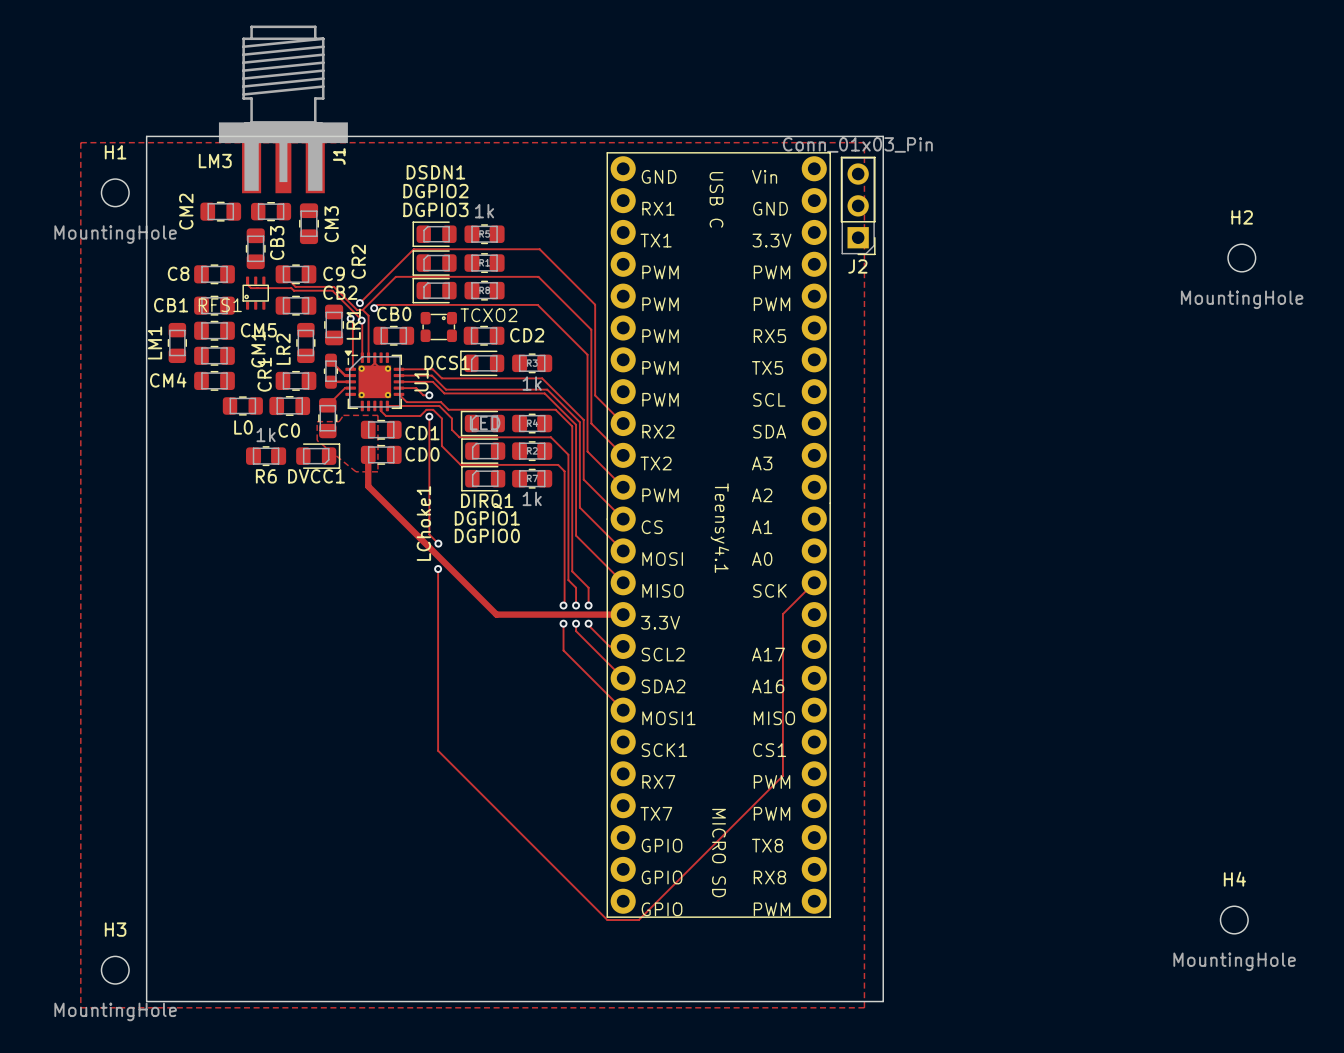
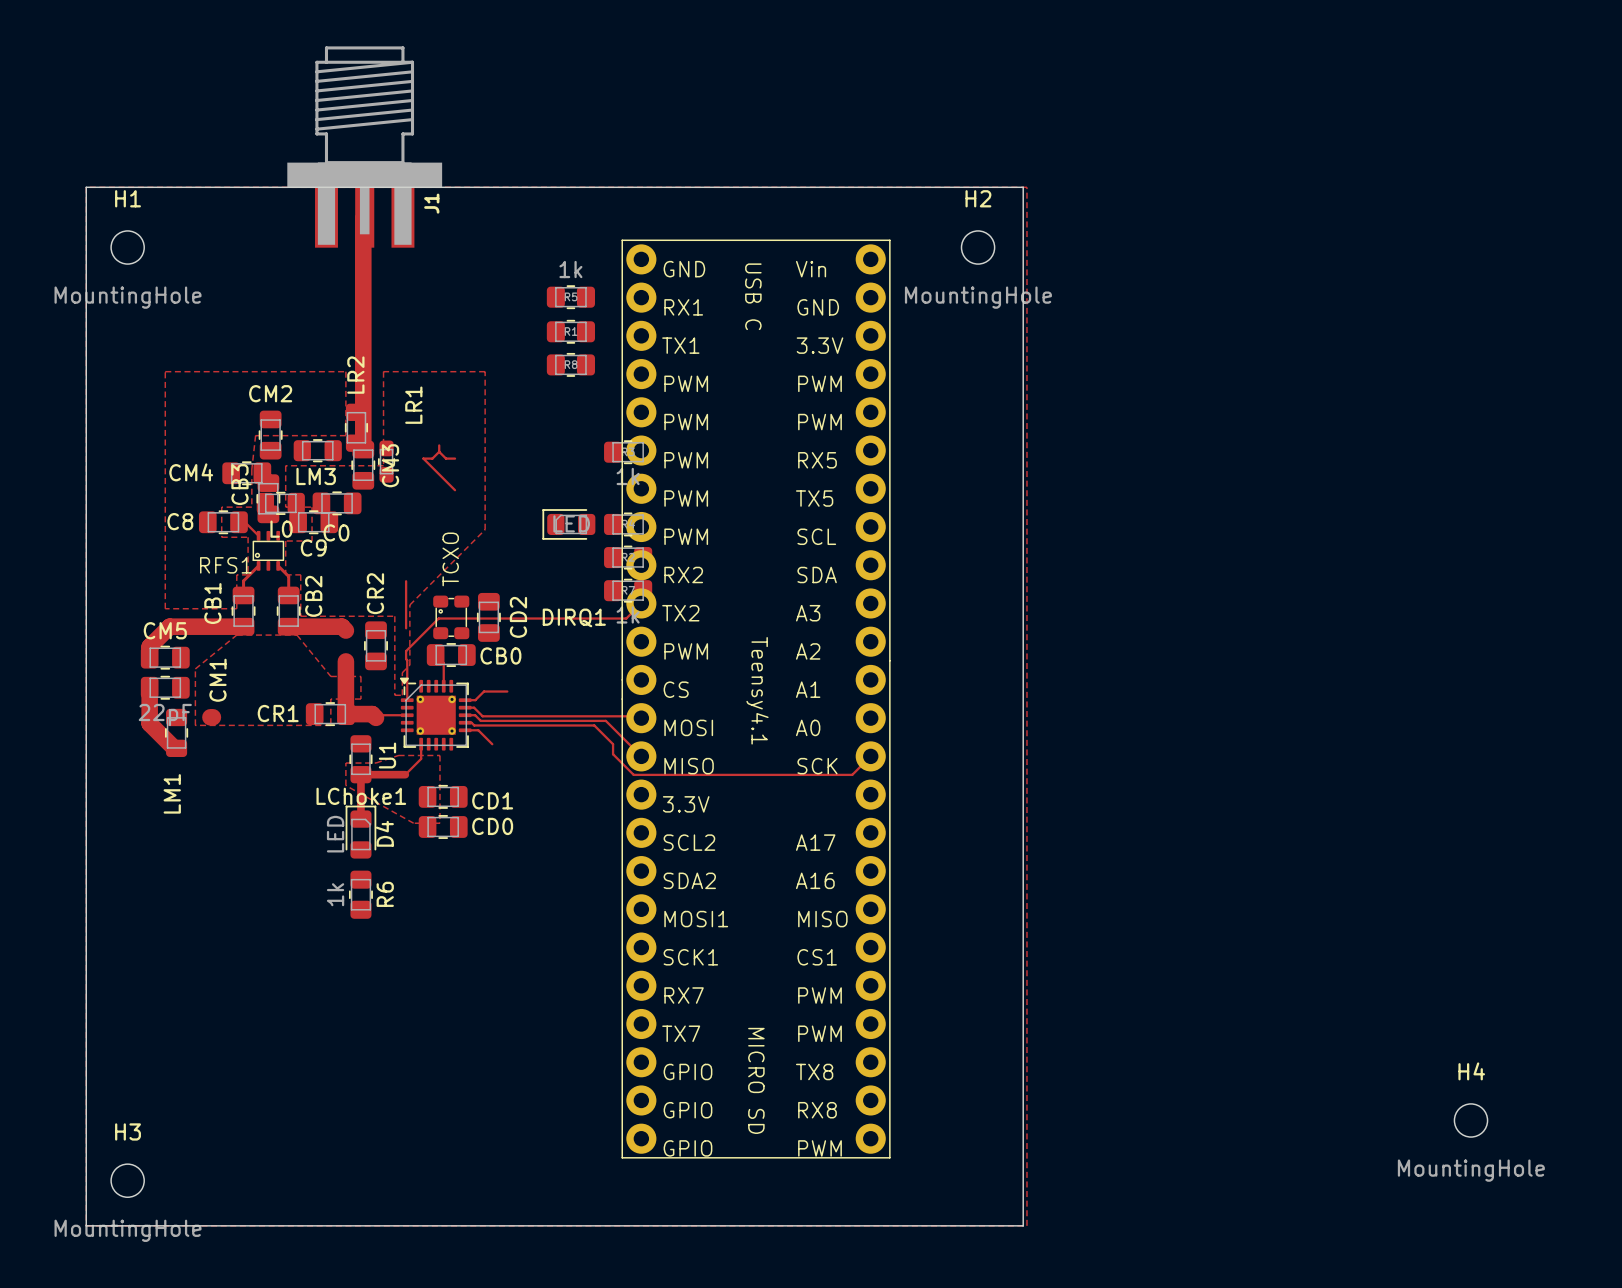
J1 position: (283, 109) -> (364, 147)
board edge: (146, 136) (883, 136) (883, 1001) (146, 1001) (146, 136) -> (86, 187) (86, 1225) (1023, 1225) (1023, 187) (86, 187)
LM3 name position: LM3 (215, 161) -> LM3 (316, 476)
track: none -> (364, 217) (363, 449)
J2: Conn_01x03_Pin (858, 205) -> none
CM2 rotation: 0° (220, 211) -> 90° clockwise (270, 435)
CM2 position: (220, 211) -> (270, 435)
LM3 position: (271, 211) -> (317, 450)
CM3 position: (309, 223) -> (363, 465)
DSDN1: (434, 234) -> none
CB3 name position: CB3 (277, 242) -> CB3 (239, 484)
CB3 position: (255, 248) -> (268, 498)
H2 position: (1241, 258) -> (978, 247)
CR2 name position: CR2 (358, 261) -> CR2 (375, 593)
DGPIO2: (434, 263) -> none
C9 name position: C9 (334, 273) -> C9 (313, 547)
C8 position: (214, 274) -> (223, 522)
track: (282, 274) (295, 286) (334, 286) (357, 309) (362, 309) -> none
C9 position: (295, 274) -> (313, 522)
track: (247, 280) (247, 284) (251, 288) (332, 290) (362, 320) -> none
DGPIO3: (434, 290) -> none
RFS1 position: (255, 293) -> (268, 550)
zone outline: none -> (165, 371) (165, 608) (236, 608) (236, 574) (248, 574) (248, 537) (221, 537) (221, 507) (251, 507) (251, 469) (255, 435) (345, 435) (345, 371) (165, 371)
zone outline: none -> (383, 371) (485, 371) (485, 529) (409, 604) (409, 665) (402, 672) (402, 695) (394, 695) (394, 616) (300, 616) (300, 574) (285, 574) (285, 541) (312, 541) (312, 507) (285, 507) (285, 465) (383, 465) (383, 371)
track: (359, 303) (413, 249) (539, 249) (595, 304) (595, 395) (623, 423) -> none
via: (359, 303) -> none
CB1 rotation: 0° (214, 305) -> 90° clockwise (243, 611)
CB1 position: (214, 305) -> (243, 611)
CB2 rotation: 0° (295, 305) -> 90° clockwise (288, 611)
CB2 position: (295, 305) -> (288, 611)
track: (374, 308) (377, 304) (537, 304) (587, 354) (587, 451) (623, 487) -> none
via: (374, 308) -> none
track: (362, 309) (368, 315) (368, 357) -> none
track: (362, 309) (395, 276) (538, 276) (591, 329) (591, 423) (623, 455) -> none
CB0 name position: CB0 (394, 313) -> CB0 (500, 655)
track: (350, 318) (352, 320) (352, 367) (350, 369) -> none
via: (350, 318) -> none
track: (361, 320) (362, 357) -> none
via: (361, 320) -> none
CR2 position: (334, 324) -> (376, 645)
TCXO2: (438, 326) -> none
CM5 position: (214, 330) -> (165, 657)
CM5 name position: CM5 (258, 330) -> CM5 (165, 630)
CB0 position: (393, 335) -> (451, 655)
CD2 rotation: 0° (484, 335) -> 90° clockwise (488, 617)
CD2 position: (484, 335) -> (488, 617)
LM1 name position: LM1 (154, 342) -> LM1 (172, 793)
LM1 position: (177, 342) -> (176, 732)
LR2 name position: LR2 (283, 349) -> LR2 (355, 375)
CM1 position: (214, 355) -> (165, 687)
track: (330, 360) (345, 375) (350, 375) -> none
DCS1: (482, 363) -> none
track: (398, 369) (432, 369) (441, 378) (542, 378) (583, 419) (583, 479) (623, 519) -> none
CR1 name rotation: 0° (264, 374) -> 90° clockwise (278, 713)
track: (398, 375) (431, 375) (445, 389) (547, 389) (579, 422) (579, 507) (623, 550) -> none
CR1 position: (295, 380) -> (330, 714)
U1 position: (374, 380) -> (435, 714)
U1 name position: U1 (421, 380) -> U1 (387, 755)
track: (350, 381) (330, 382) -> none
track: (398, 381) (432, 381) (444, 393) (544, 393) (576, 424) (576, 535) (623, 582) -> none
track: (350, 388) (345, 388) (327, 405) -> none
track: (398, 388) (416, 388) (423, 395) (429, 395) -> none
track: (398, 394) (406, 402) (440, 402) (448, 409) (555, 409) (572, 426) (572, 571) (588, 587) (588, 605) -> none
via: (429, 395) -> none
track: (381, 405) (381, 411) (385, 416) (420, 416) (426, 409) (433, 409) (441, 418) (441, 446) (460, 464) (558, 464) (564, 471) (563, 605) -> none
track: (387, 405) (439, 405) (451, 418) (451, 429) (459, 437) (550, 437) (568, 454) (568, 580) (576, 587) (576, 605) -> none
zone outline: (343, 415) (339, 421) (317, 421) (317, 440) (356, 471) (377, 471) (377, 415) (343, 415) -> none
track: (429, 416) (429, 534) (438, 543) -> none
via: (429, 416) -> none
LChoke1 position: (327, 418) -> (360, 759)
track: none -> (239, 522) (245, 522) (258, 535)
CD1 position: (381, 429) -> (443, 796)
R6 value position: 1k (266, 434) -> 1k (335, 894)
DGPIO1: (483, 451) -> none
track: (368, 454) (368, 486) (496, 614) (623, 614) -> none
CD0 position: (381, 454) -> (443, 826)
R6 rotation: 0° (266, 456) -> 90° clockwise (360, 894)
R6 position: (266, 456) -> (360, 894)
DVCC1: (318, 456) -> none
track: none -> (258, 565) (243, 580) (243, 595)
track: none -> (278, 565) (288, 576) (288, 595)
track: none -> (406, 581) (406, 628)
R6 name position: R6 (266, 476) -> R6 (385, 894)
DGPIO0: (483, 478) -> none
track: none -> (641, 603) (626, 618) (438, 618) (406, 651) (407, 700)
TCXO: none -> (451, 617)
track: none -> (243, 626) (169, 626) (149, 646) (149, 657)
track: none -> (288, 626) (342, 626) (345, 630)
zone outline: none -> (236, 635) (195, 668) (195, 725) (330, 725) (330, 699) (360, 699) (360, 676) (330, 676) (296, 635) (236, 635)
LChoke1 name rotation: 0° (423, 523) -> 90° clockwise (361, 796)
LChoke1 name position: LChoke1 (423, 523) -> LChoke1 (361, 796)
track: none -> (435, 655) (443, 663) (443, 686)
Teensy4.1 position: (718, 534) -> (756, 699)
track: none -> (345, 661) (345, 714) (372, 714) (376, 717) (378, 715) (407, 715)
via: (438, 543) -> none
track: none -> (149, 687) (149, 723) (176, 748)
track: none -> (507, 691) (484, 691) (475, 700) (465, 700)
track: (438, 569) (438, 750) (607, 920) (638, 920) (782, 775) (782, 614) (814, 582) -> none
via: (438, 569) -> none
track: none -> (465, 707) (474, 707) (482, 716) (639, 716) (641, 718)
CM1 value: none -> 22pF (165, 714)
track: none -> (465, 715) (475, 715) (480, 720) (605, 720) (641, 756)
track: none -> (210, 717) (212, 717)
track: none -> (465, 722) (471, 722) (474, 725) (594, 725) (613, 744) (613, 754) (633, 774) (852, 774) (870, 756)
track: none -> (465, 730) (478, 730) (492, 744)
via: (563, 605) -> none
via: (576, 605) -> none
via: (588, 605) -> none
track: none -> (421, 744) (421, 758) (405, 774) (360, 774) (360, 819)
zone outline: none -> (398, 755) (376, 763) (345, 763) (345, 785) (413, 823) (439, 823) (439, 755) (398, 755)
track: (563, 623) (563, 650) (623, 710) -> none
via: (563, 623) -> none
track: (576, 623) (576, 631) (623, 678) -> none
via: (576, 623) -> none
track: (588, 623) (609, 646) (623, 646) -> none
via: (588, 623) -> none
D4: none -> LED (360, 832)

